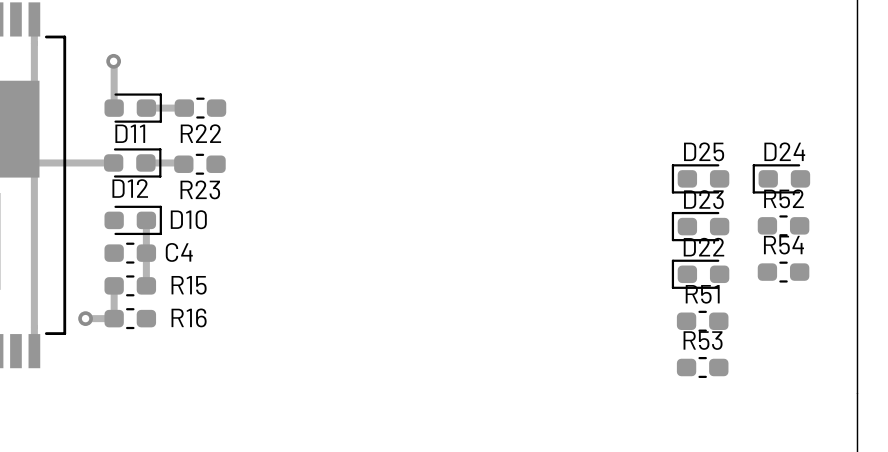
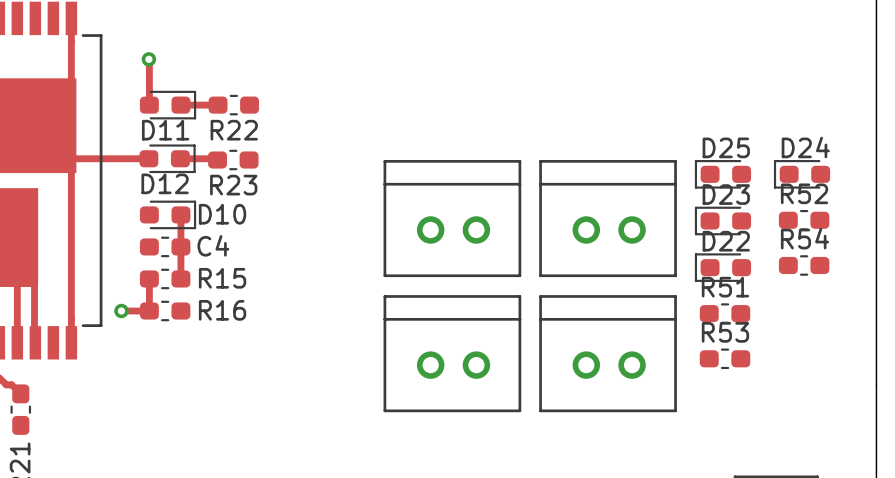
part: none -> (452, 218)
part: none -> (608, 218)
part: none -> (452, 353)
part: none -> (608, 353)

